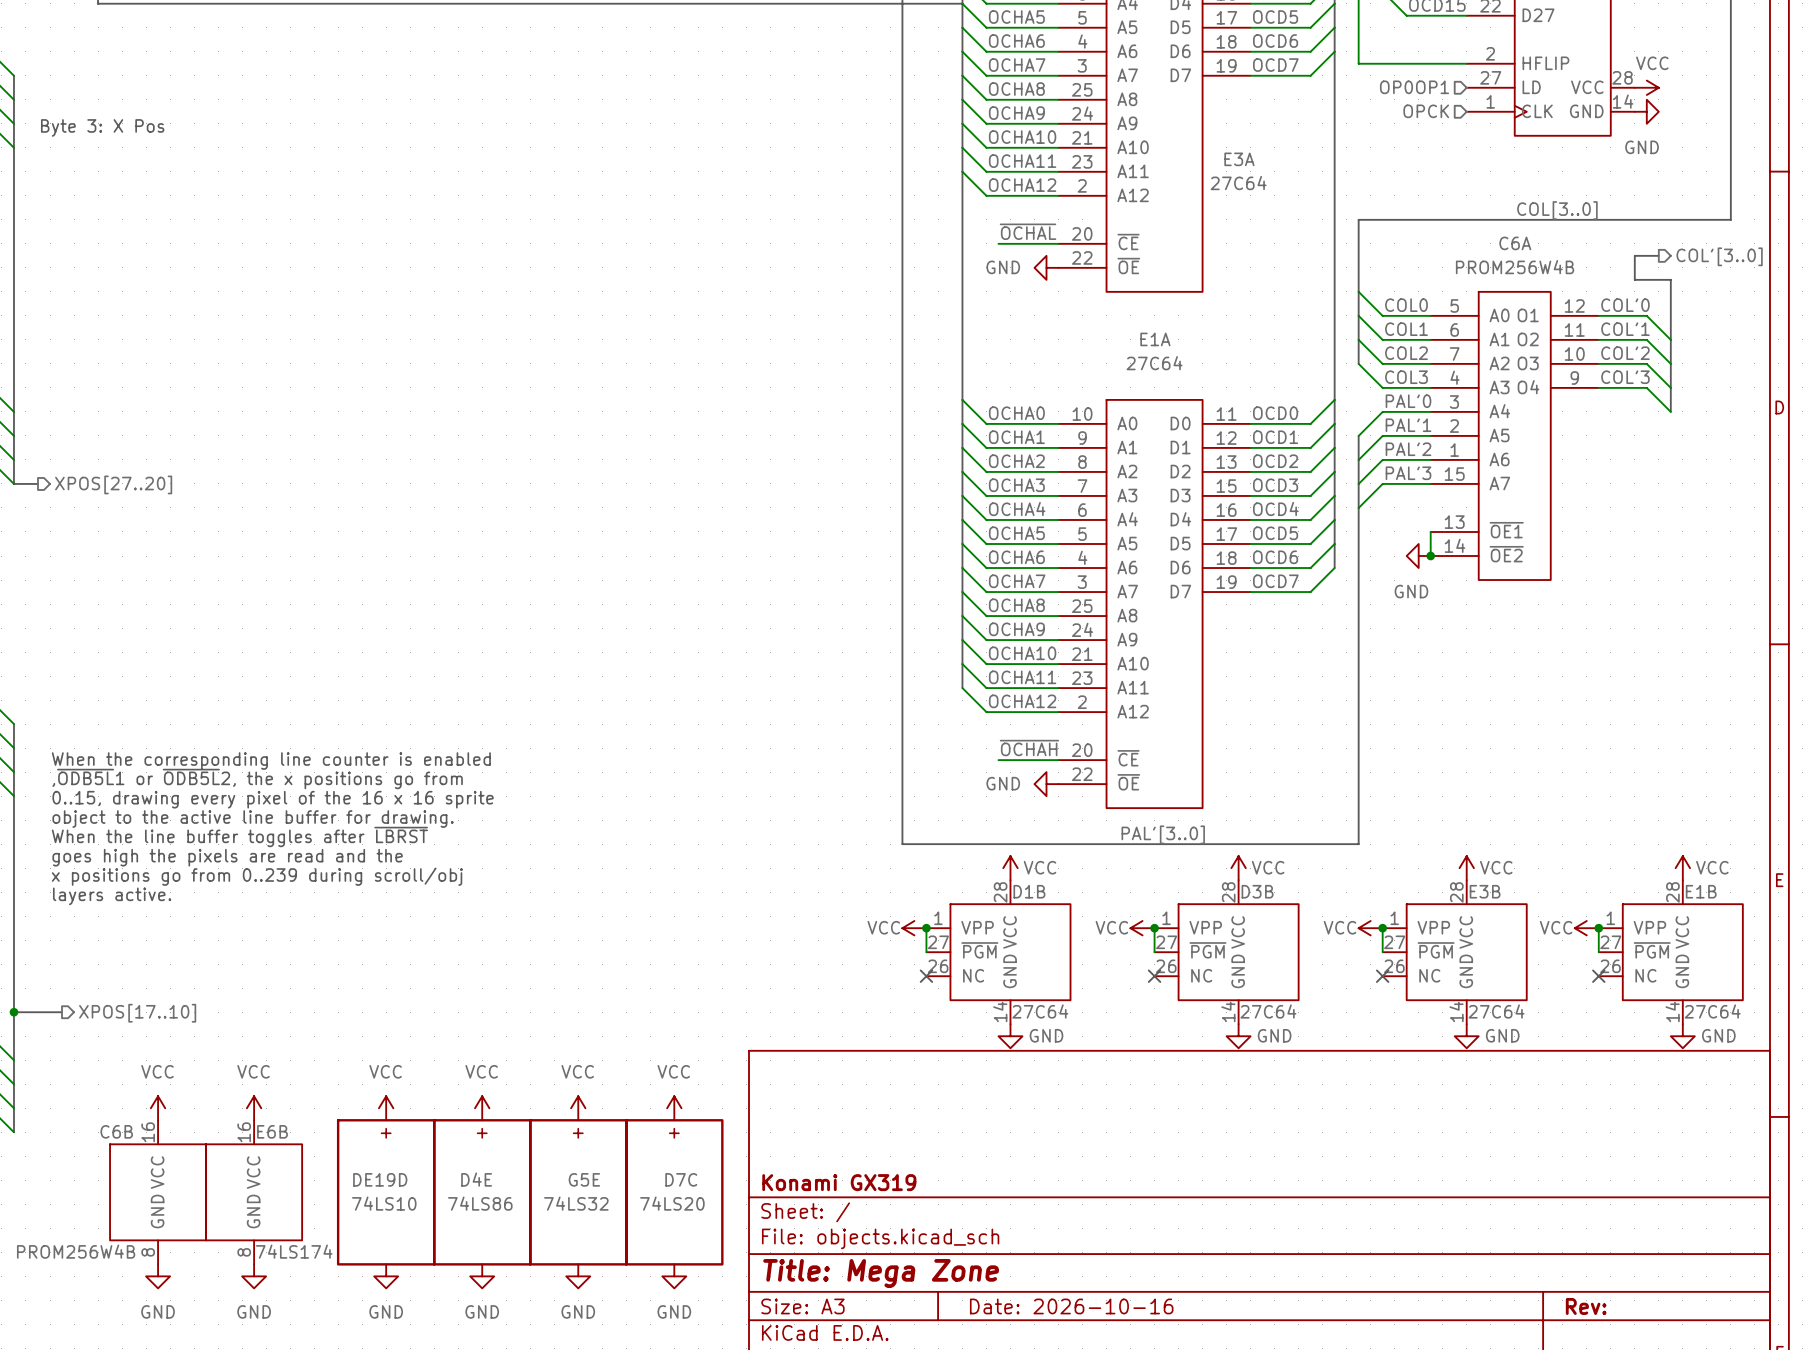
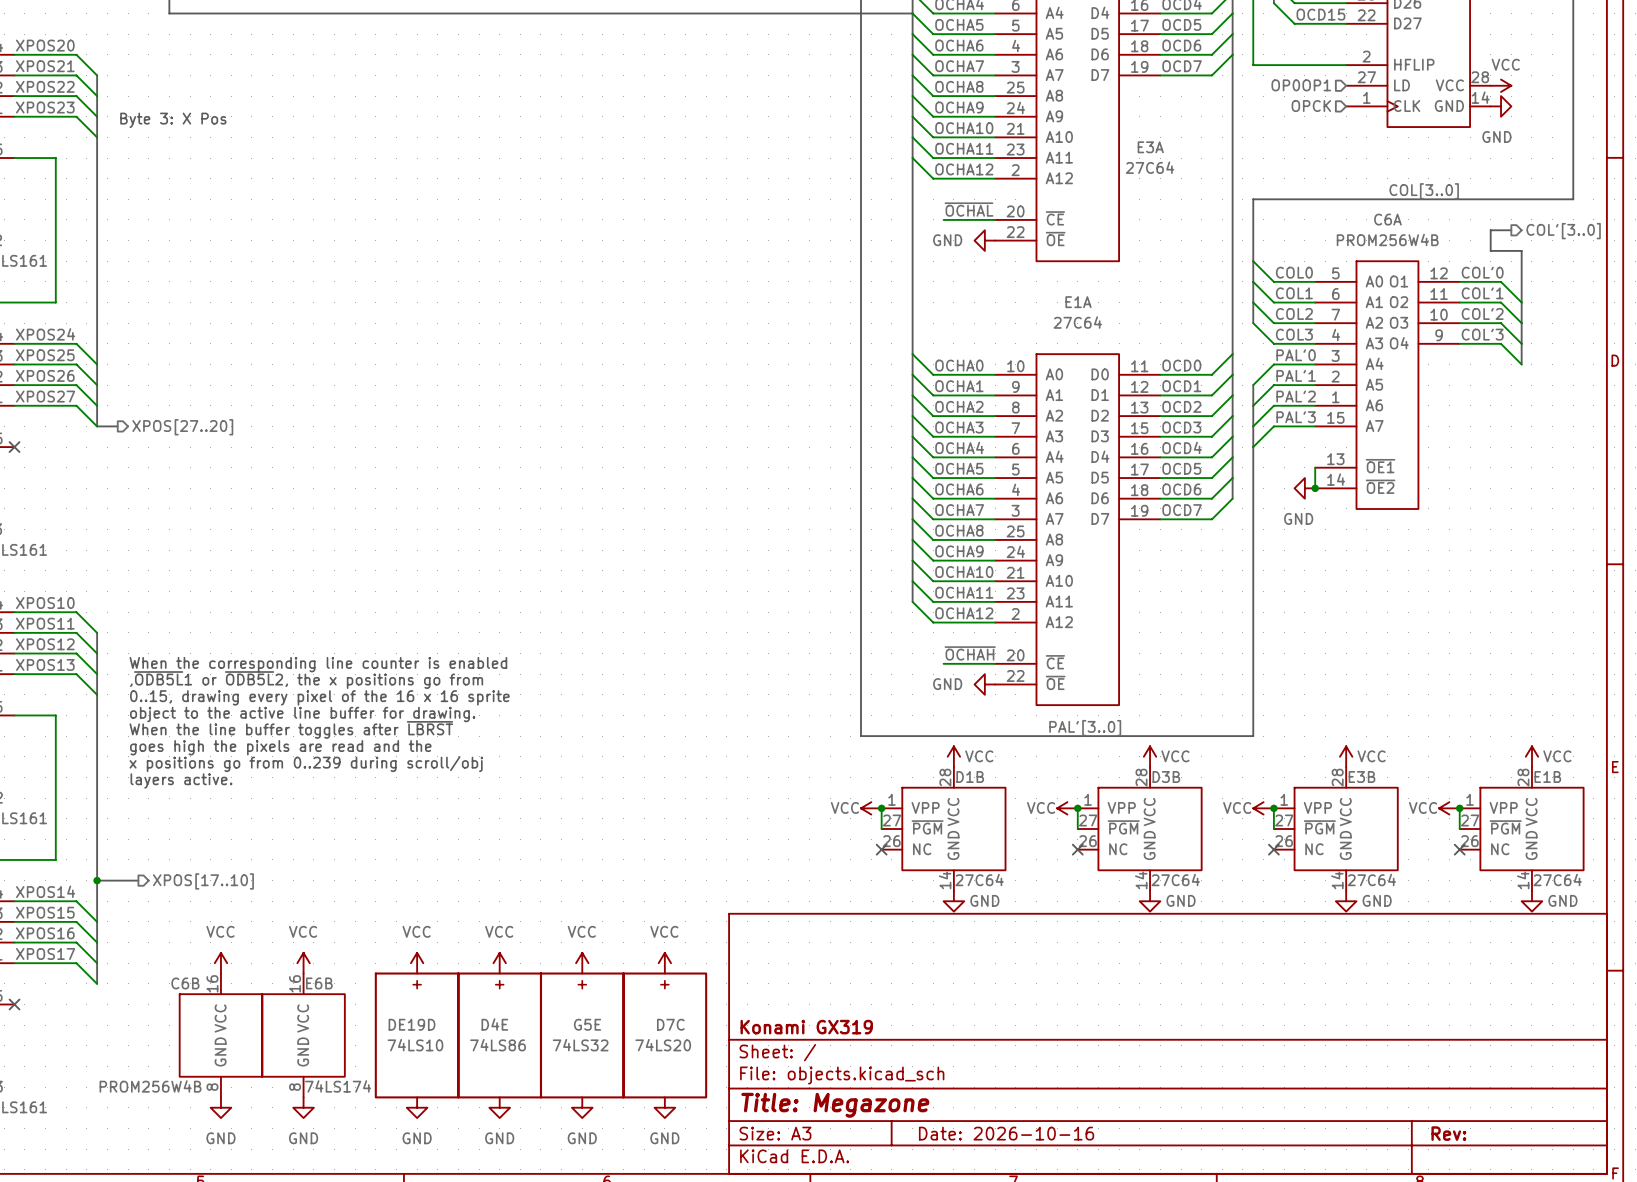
title block: Title: Mega Zone (881, 1273) -> Title: Megazone (835, 1105)

